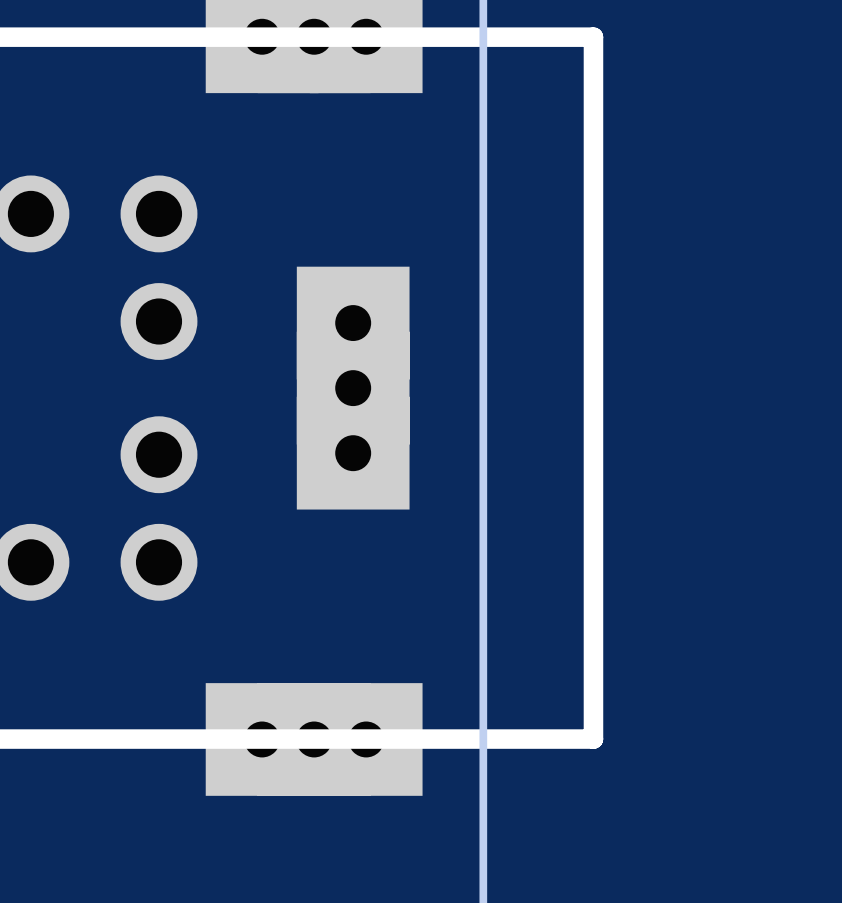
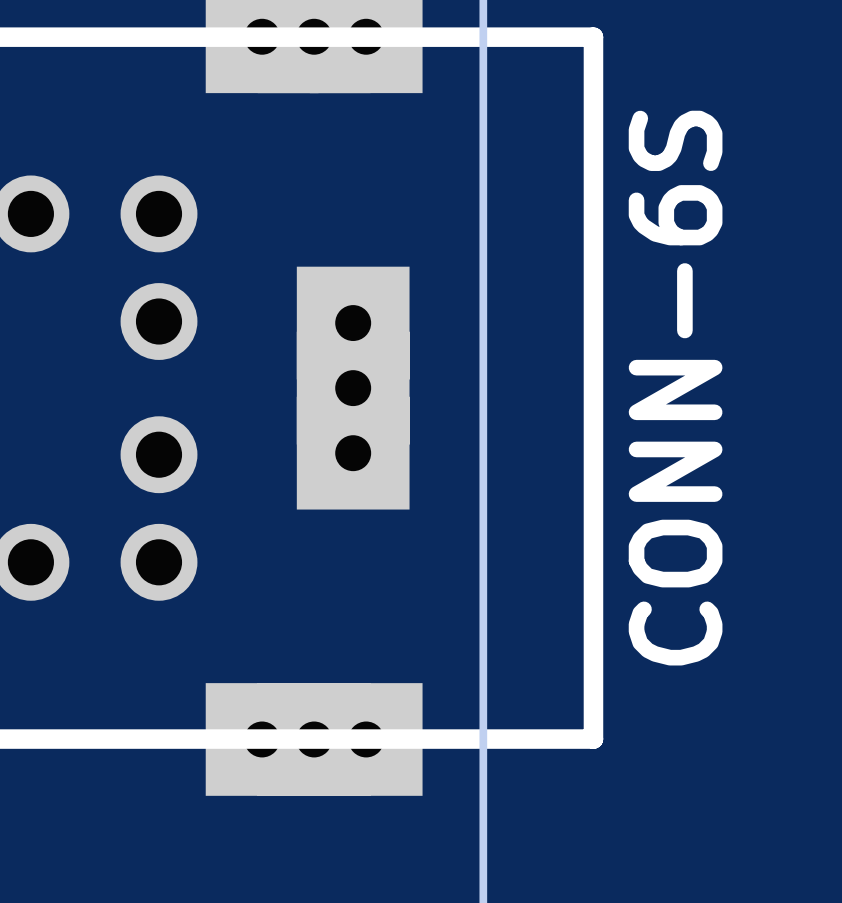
part value: none -> CONN-6S (675, 388)

